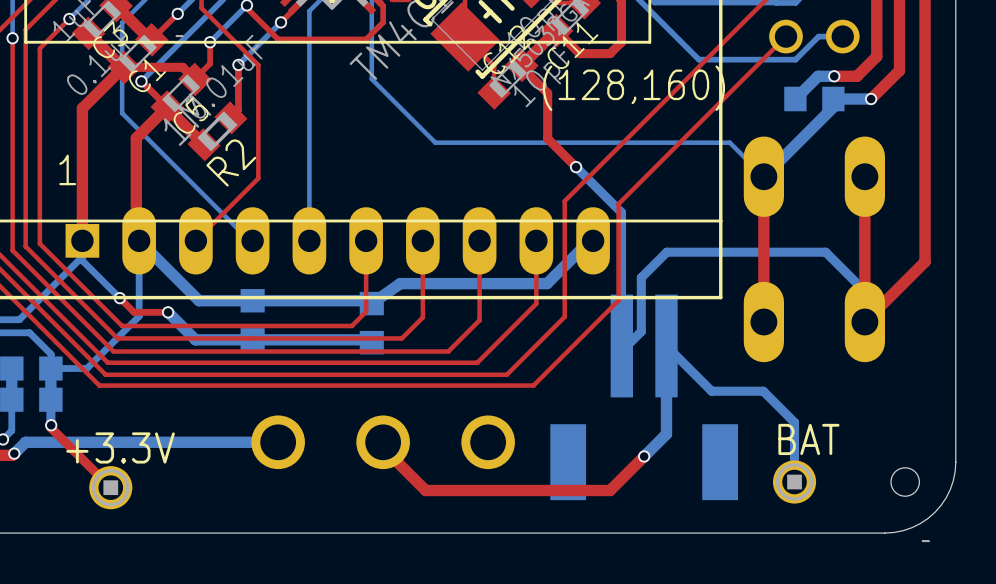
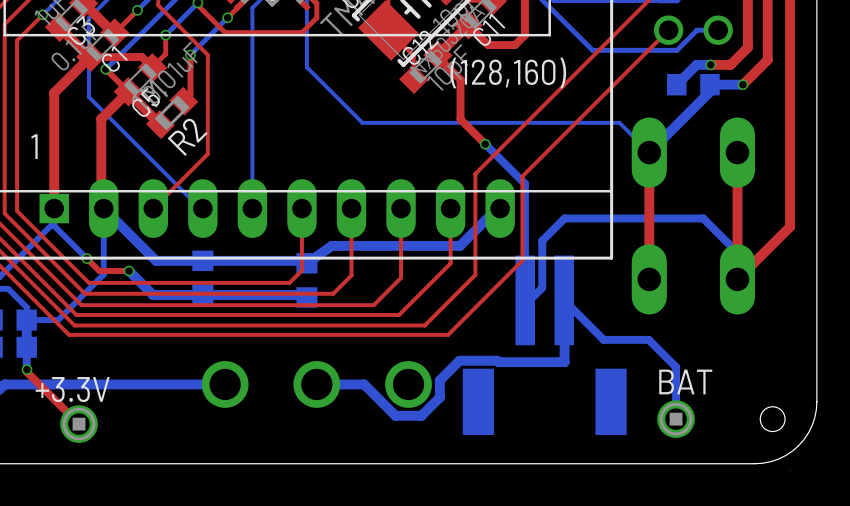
bottom track: (666, 346) (666, 434) (644, 456) -> (564, 300) (564, 362) (459, 360) (439, 380) (439, 397) (421, 415) (395, 415) (364, 384) (316, 384)
top track: (383, 442) (383, 447) (425, 490) (610, 490) (644, 456) -> none
via: (644, 456) -> none

